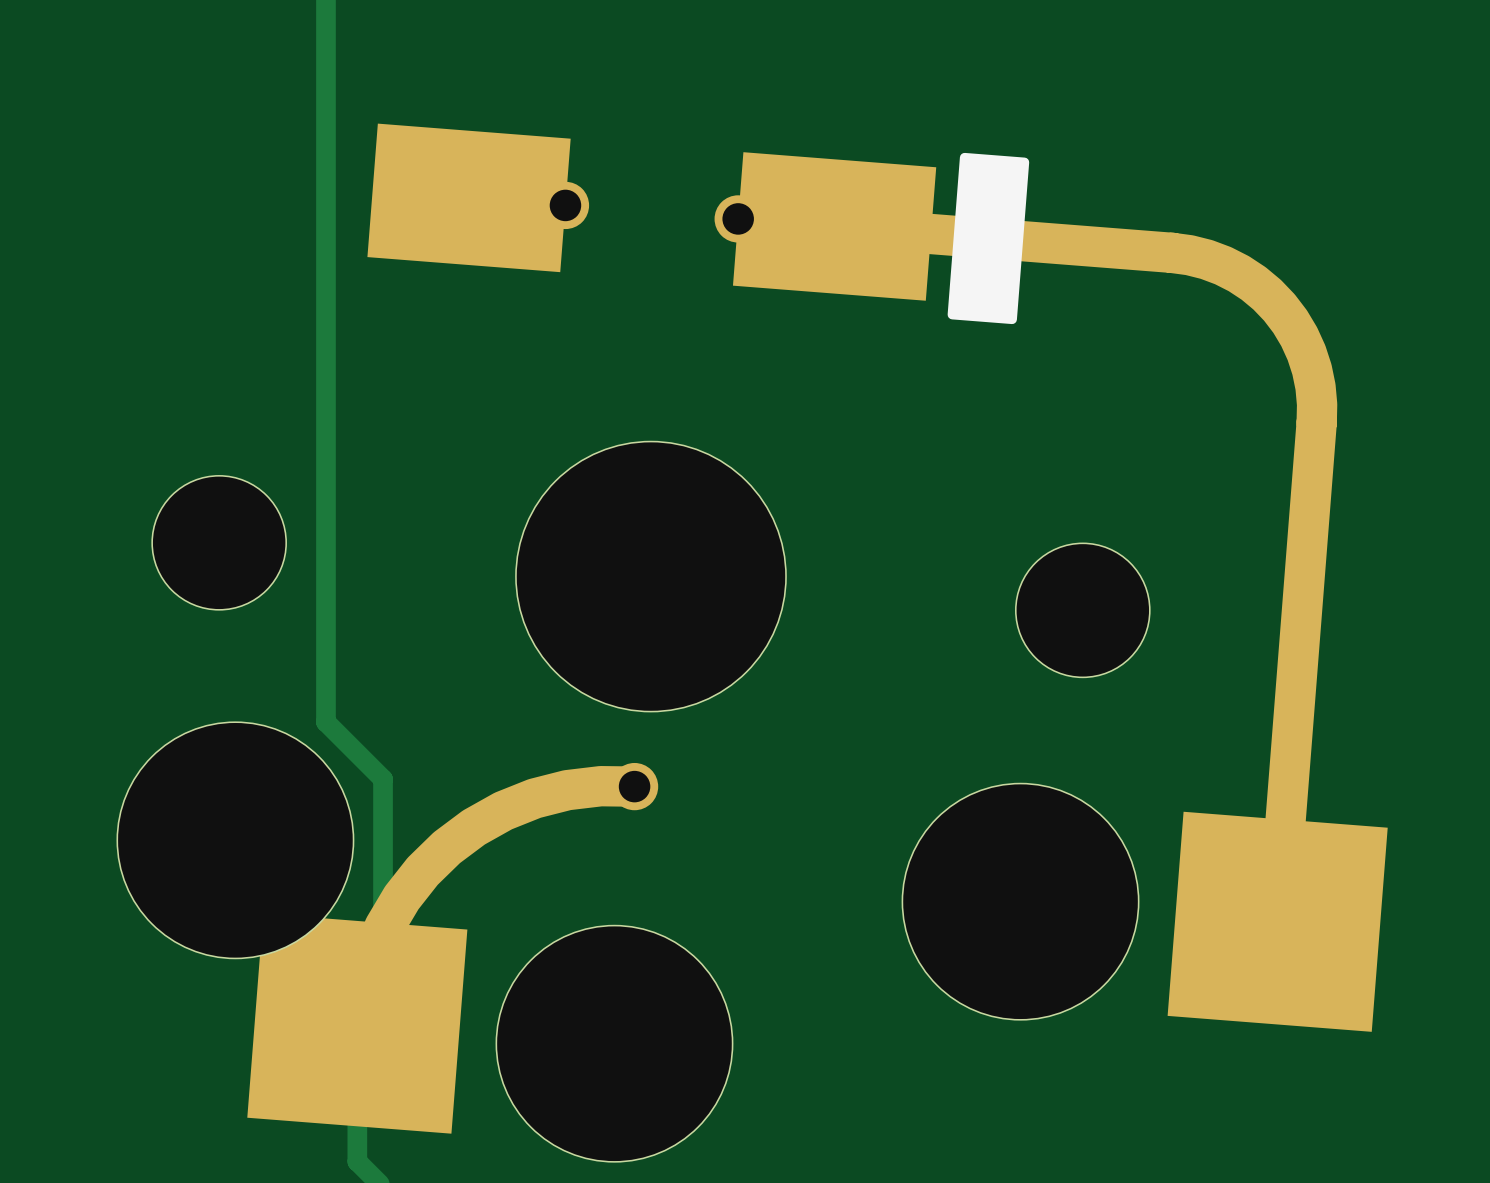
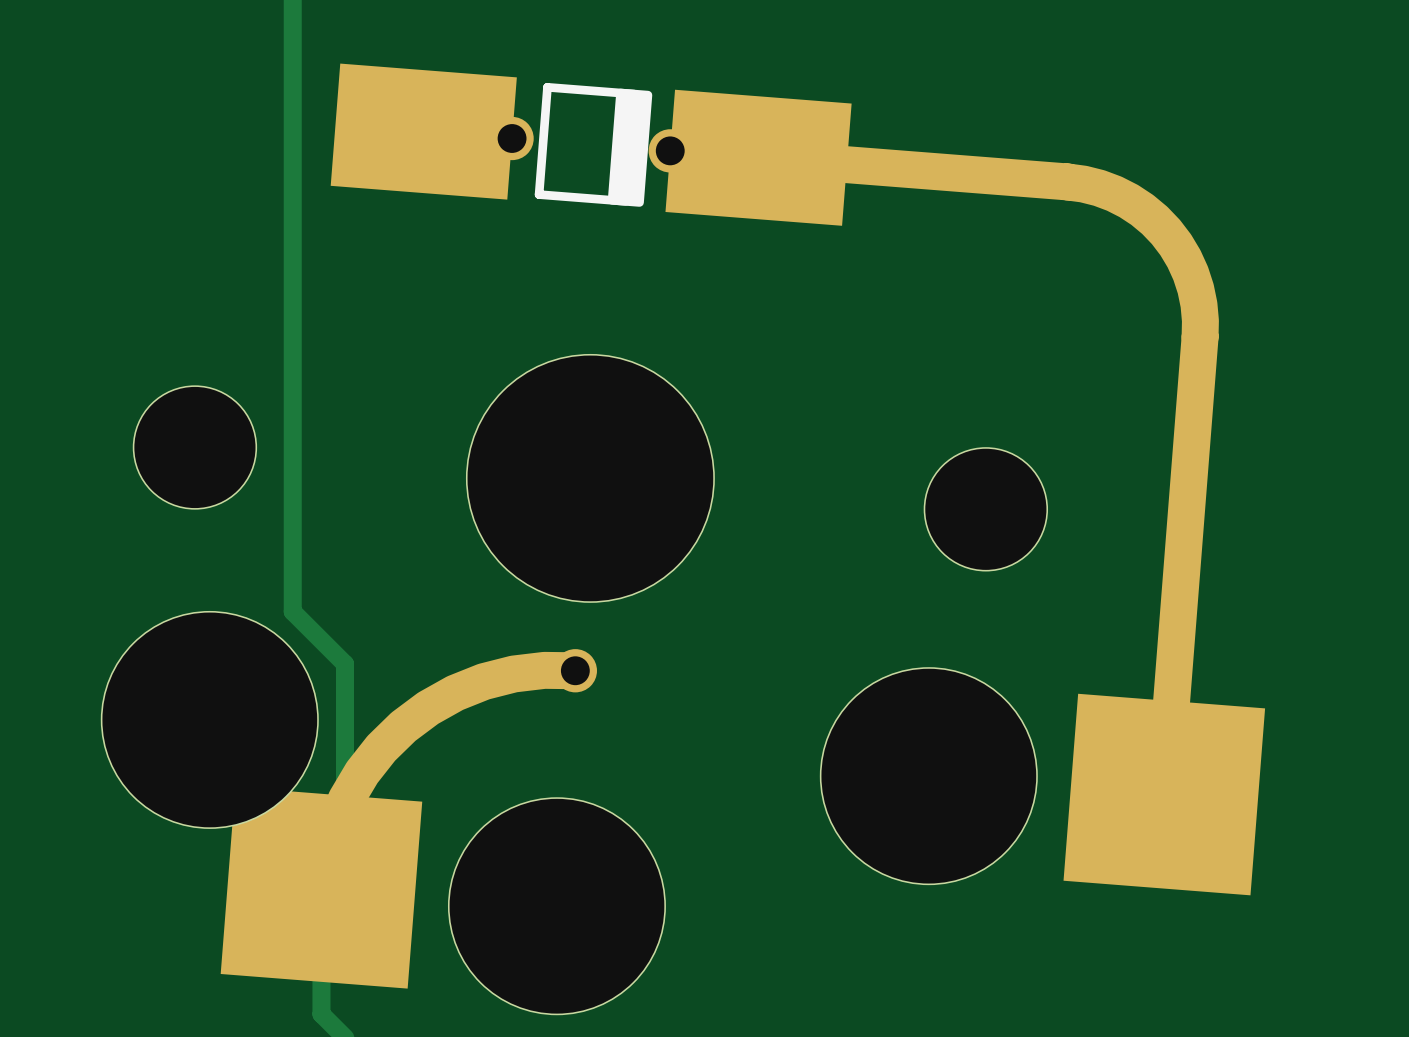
part footprint: [117, 123, 1388, 1162] -> [101, 63, 1266, 1015]

